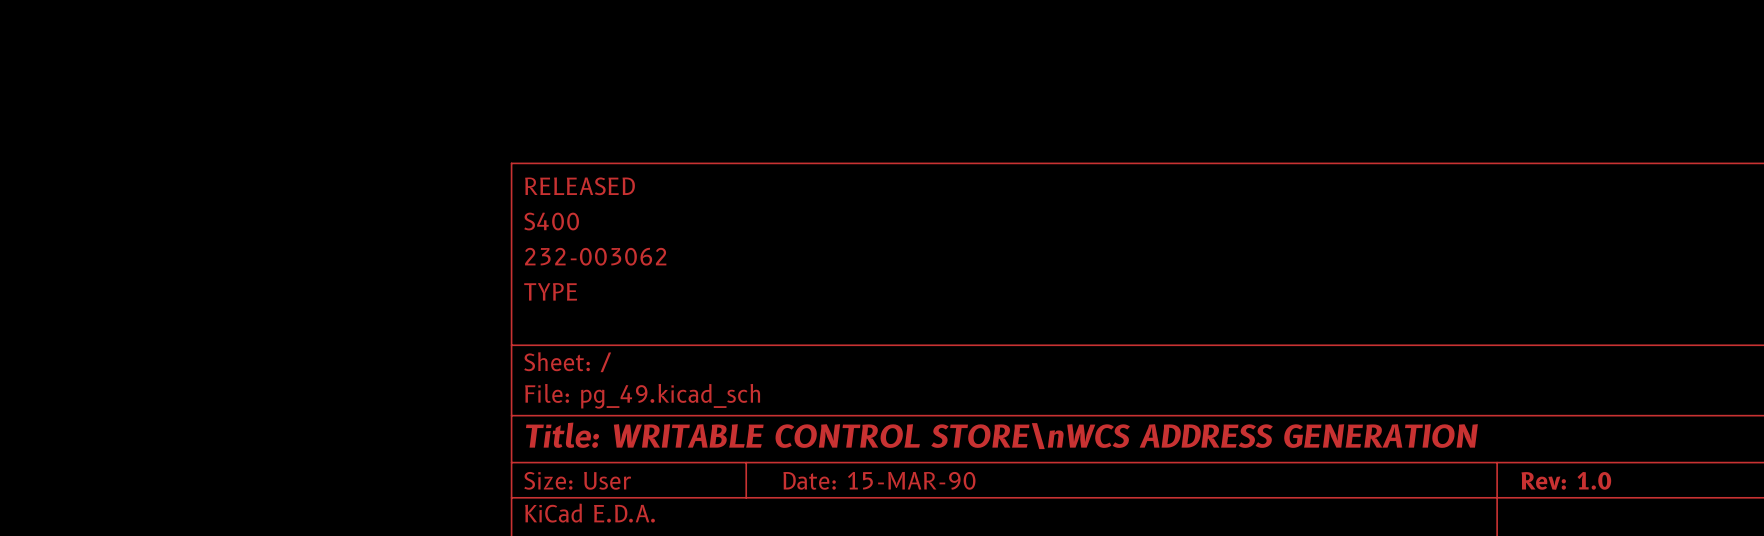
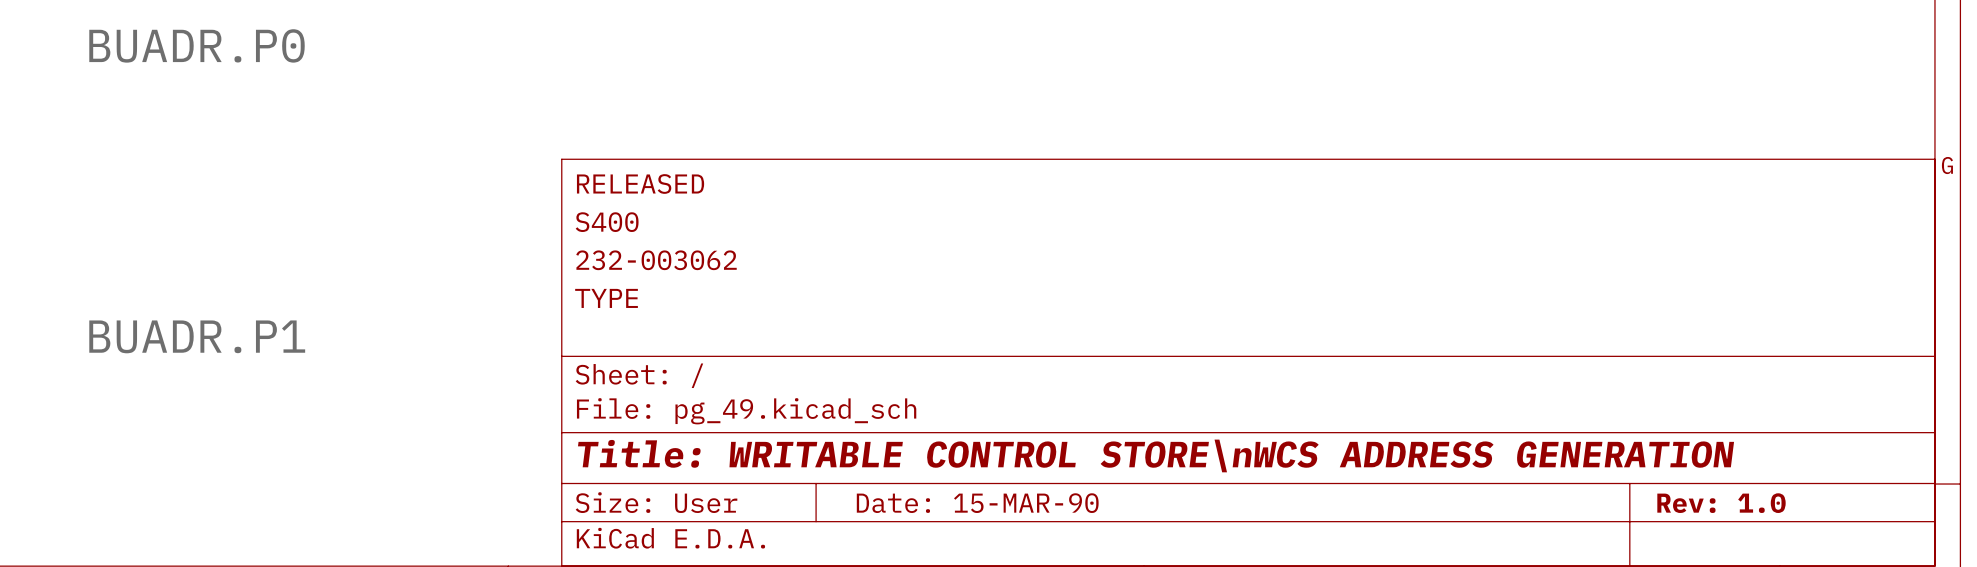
label: none -> BUADR.P0 (197, 45)
label: none -> BUADR.P1 (197, 336)

